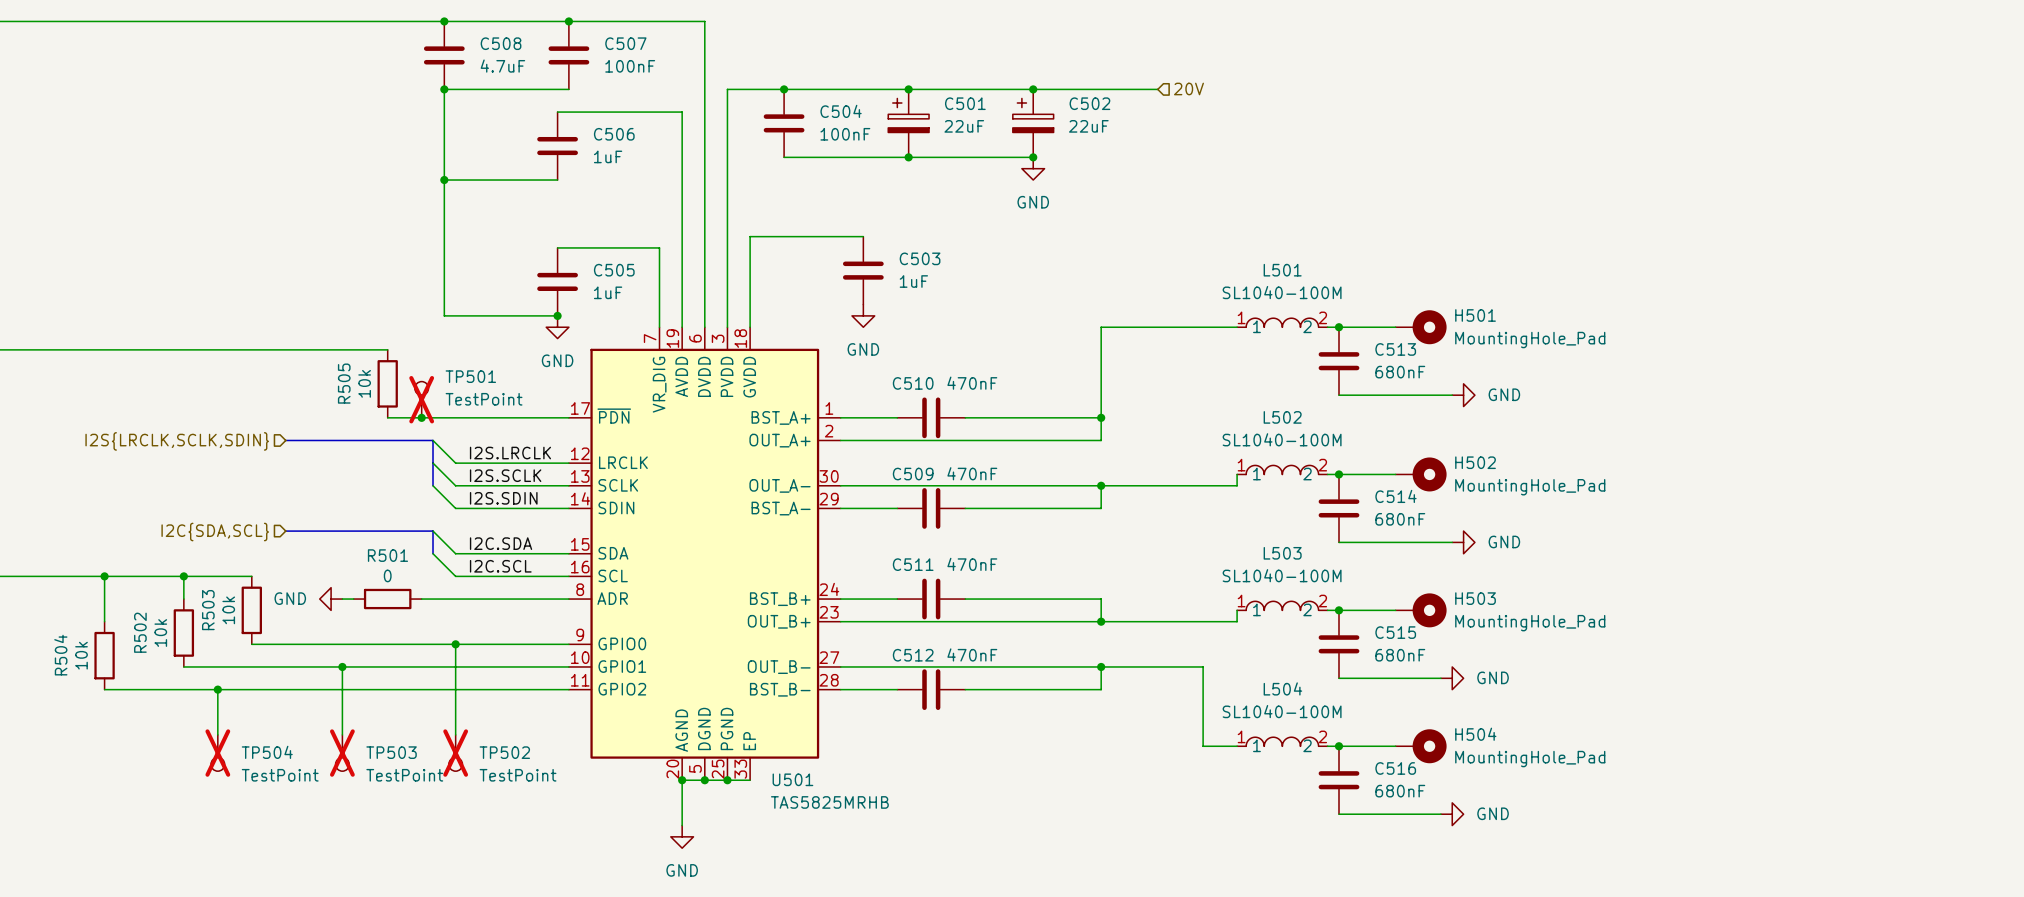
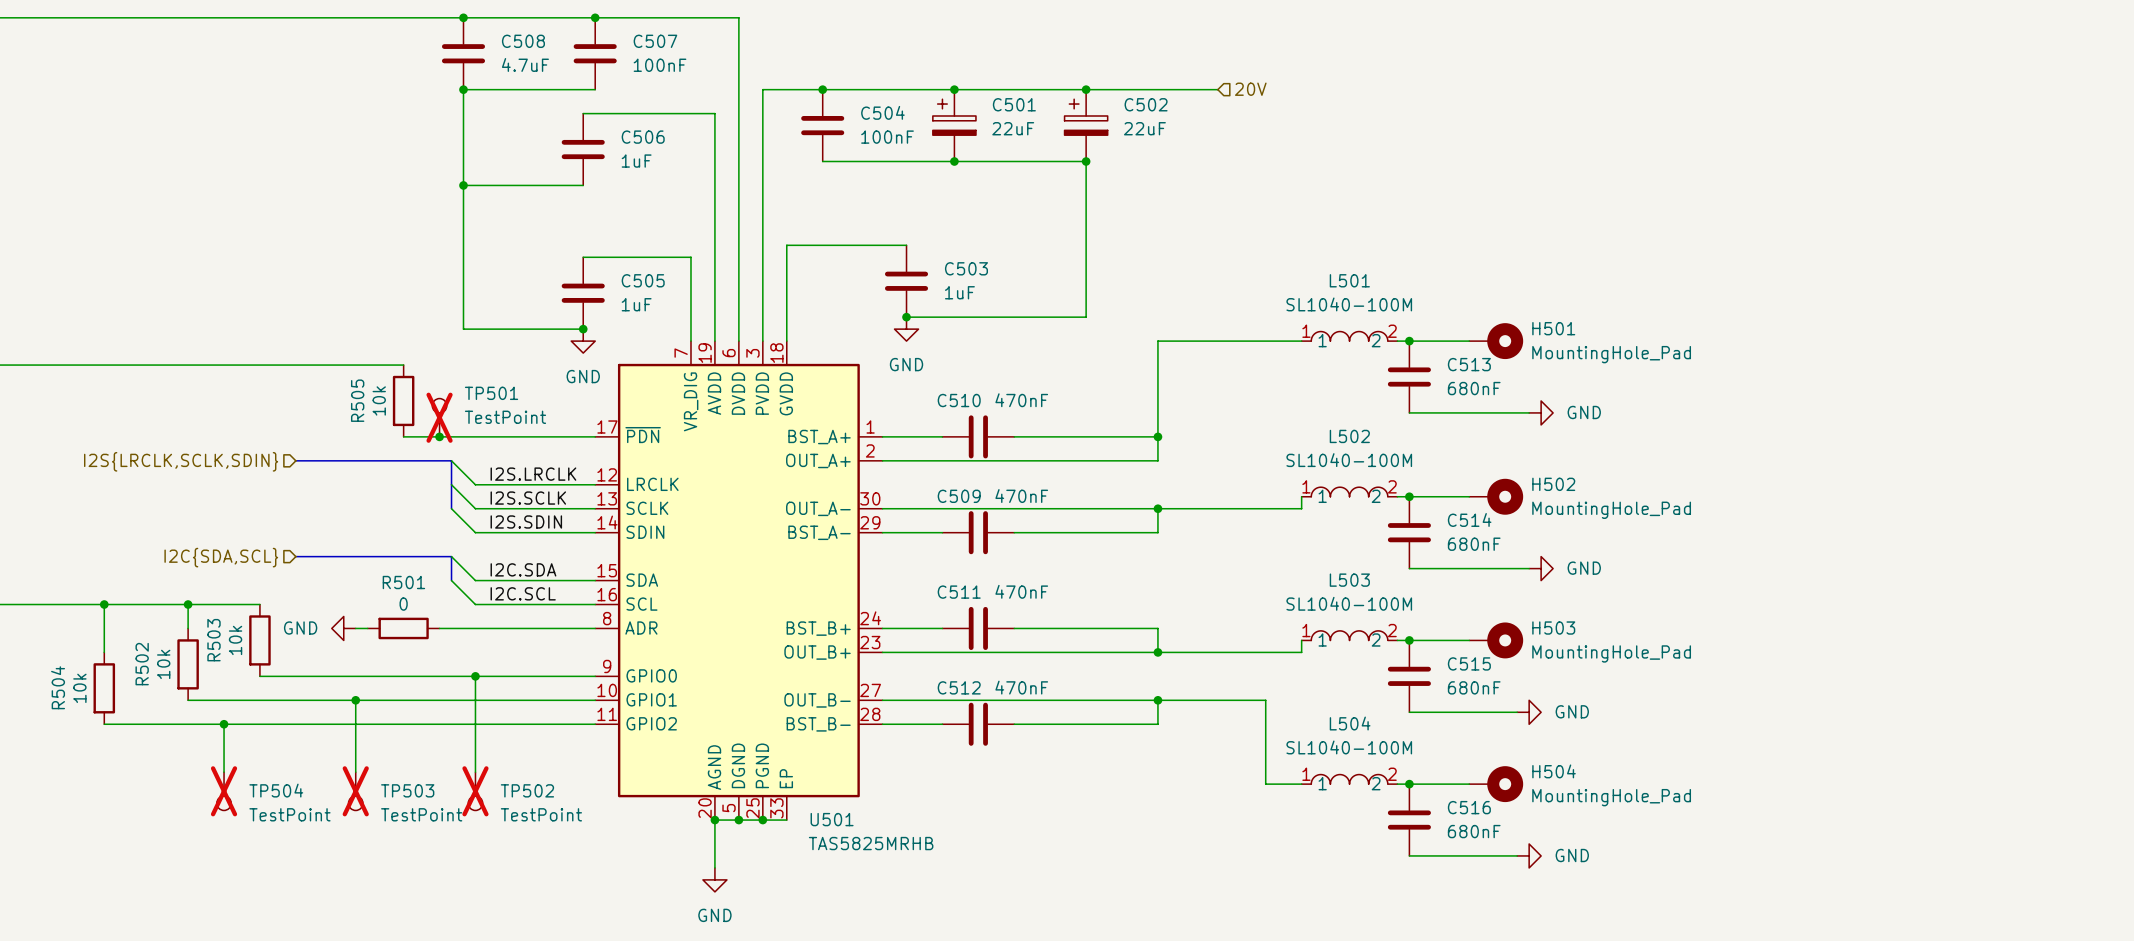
wire: none -> (1086, 161) (1086, 317) (906, 317)
power symbol: GND (1033, 168) -> none
junction: none -> (906, 317)

